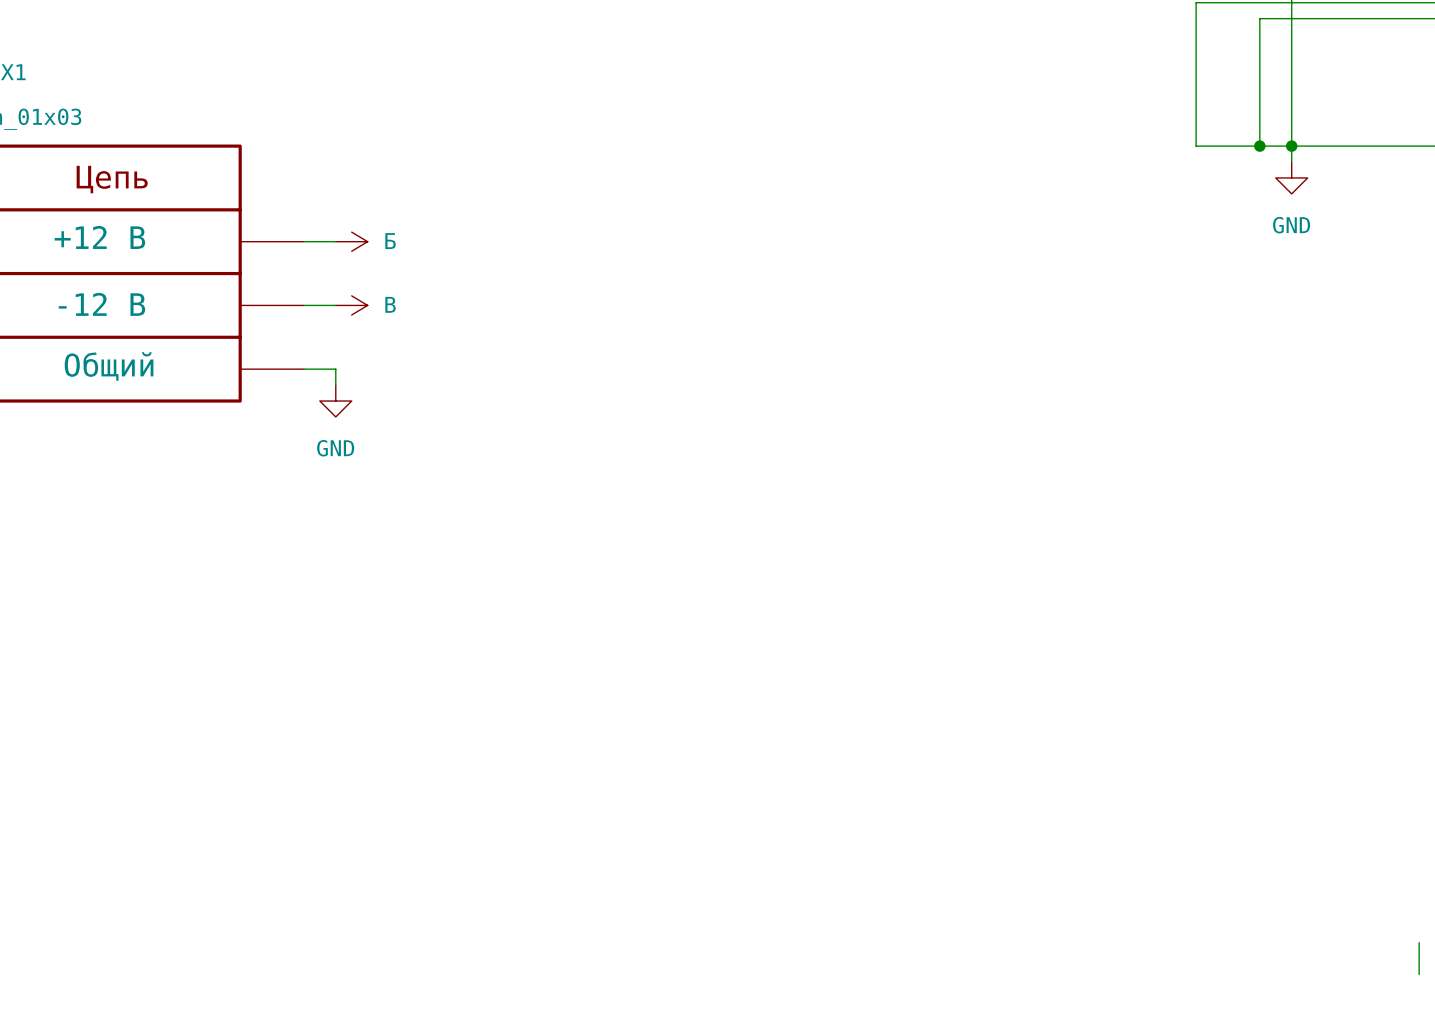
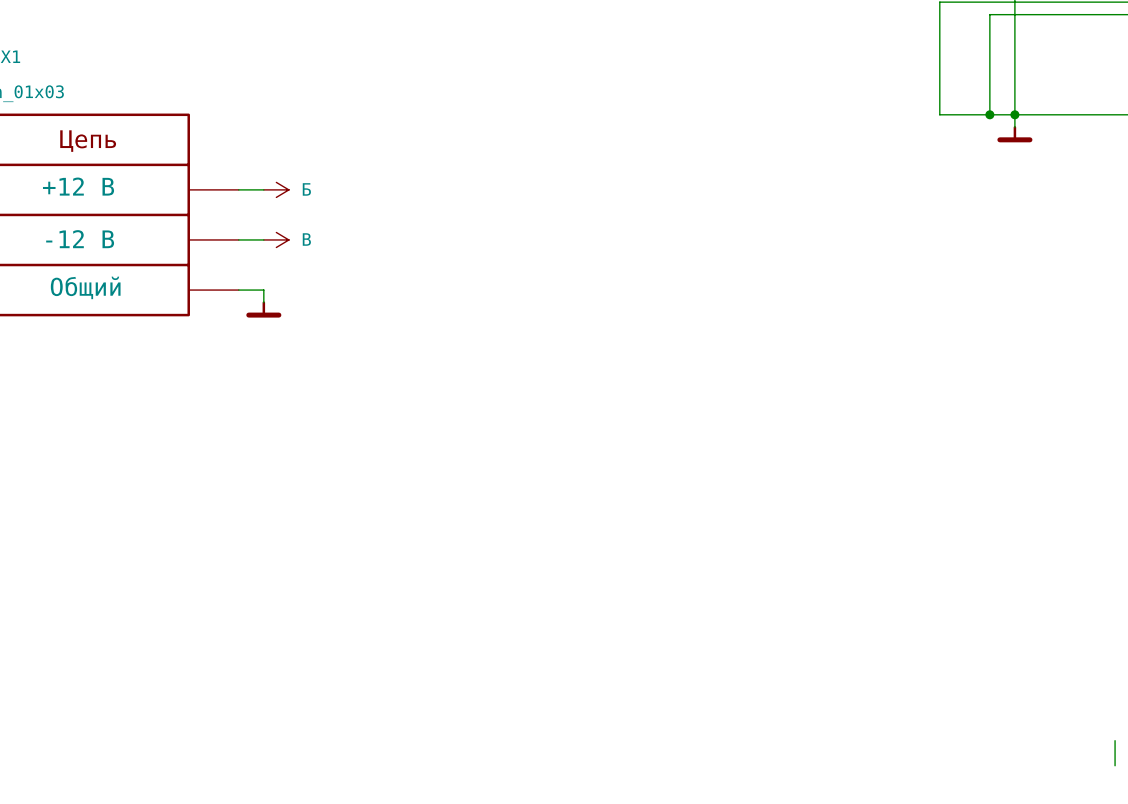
power symbol shape: [1275, 162, 1308, 194] -> [997, 126, 1033, 143]
power symbol text: GND (1291, 225) -> none
power symbol shape: [319, 385, 352, 417] -> [246, 301, 282, 318]
power symbol text: GND (335, 448) -> none

